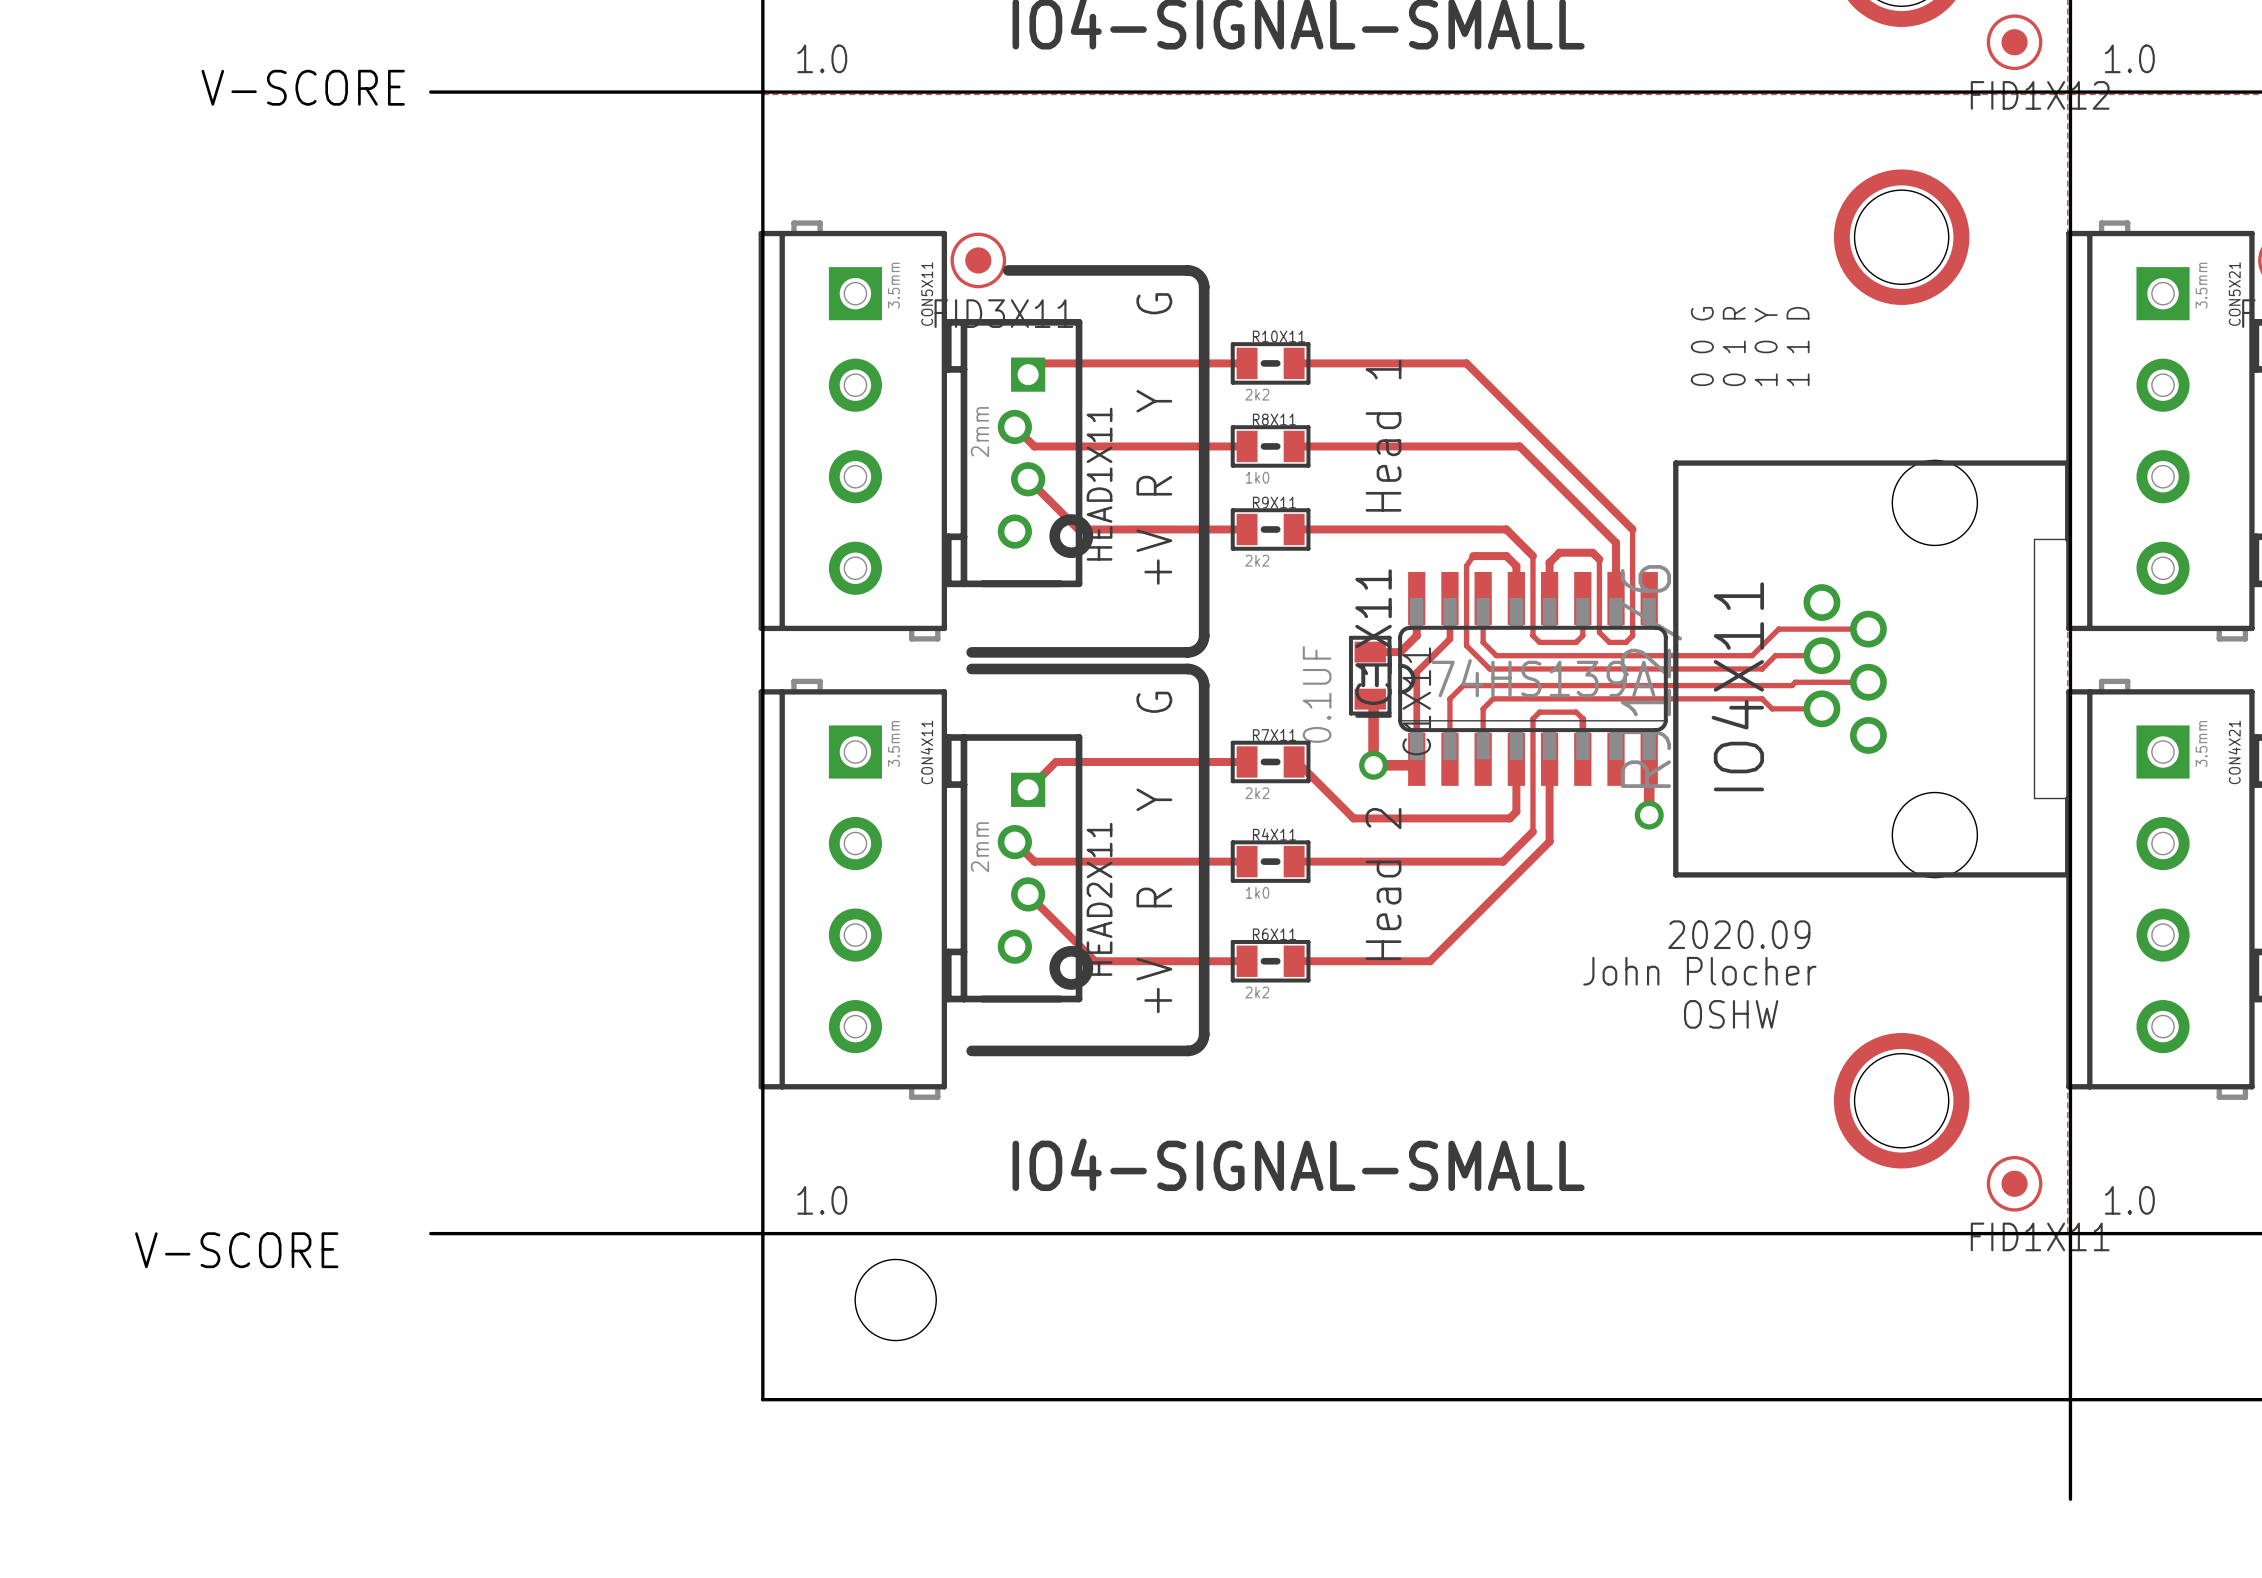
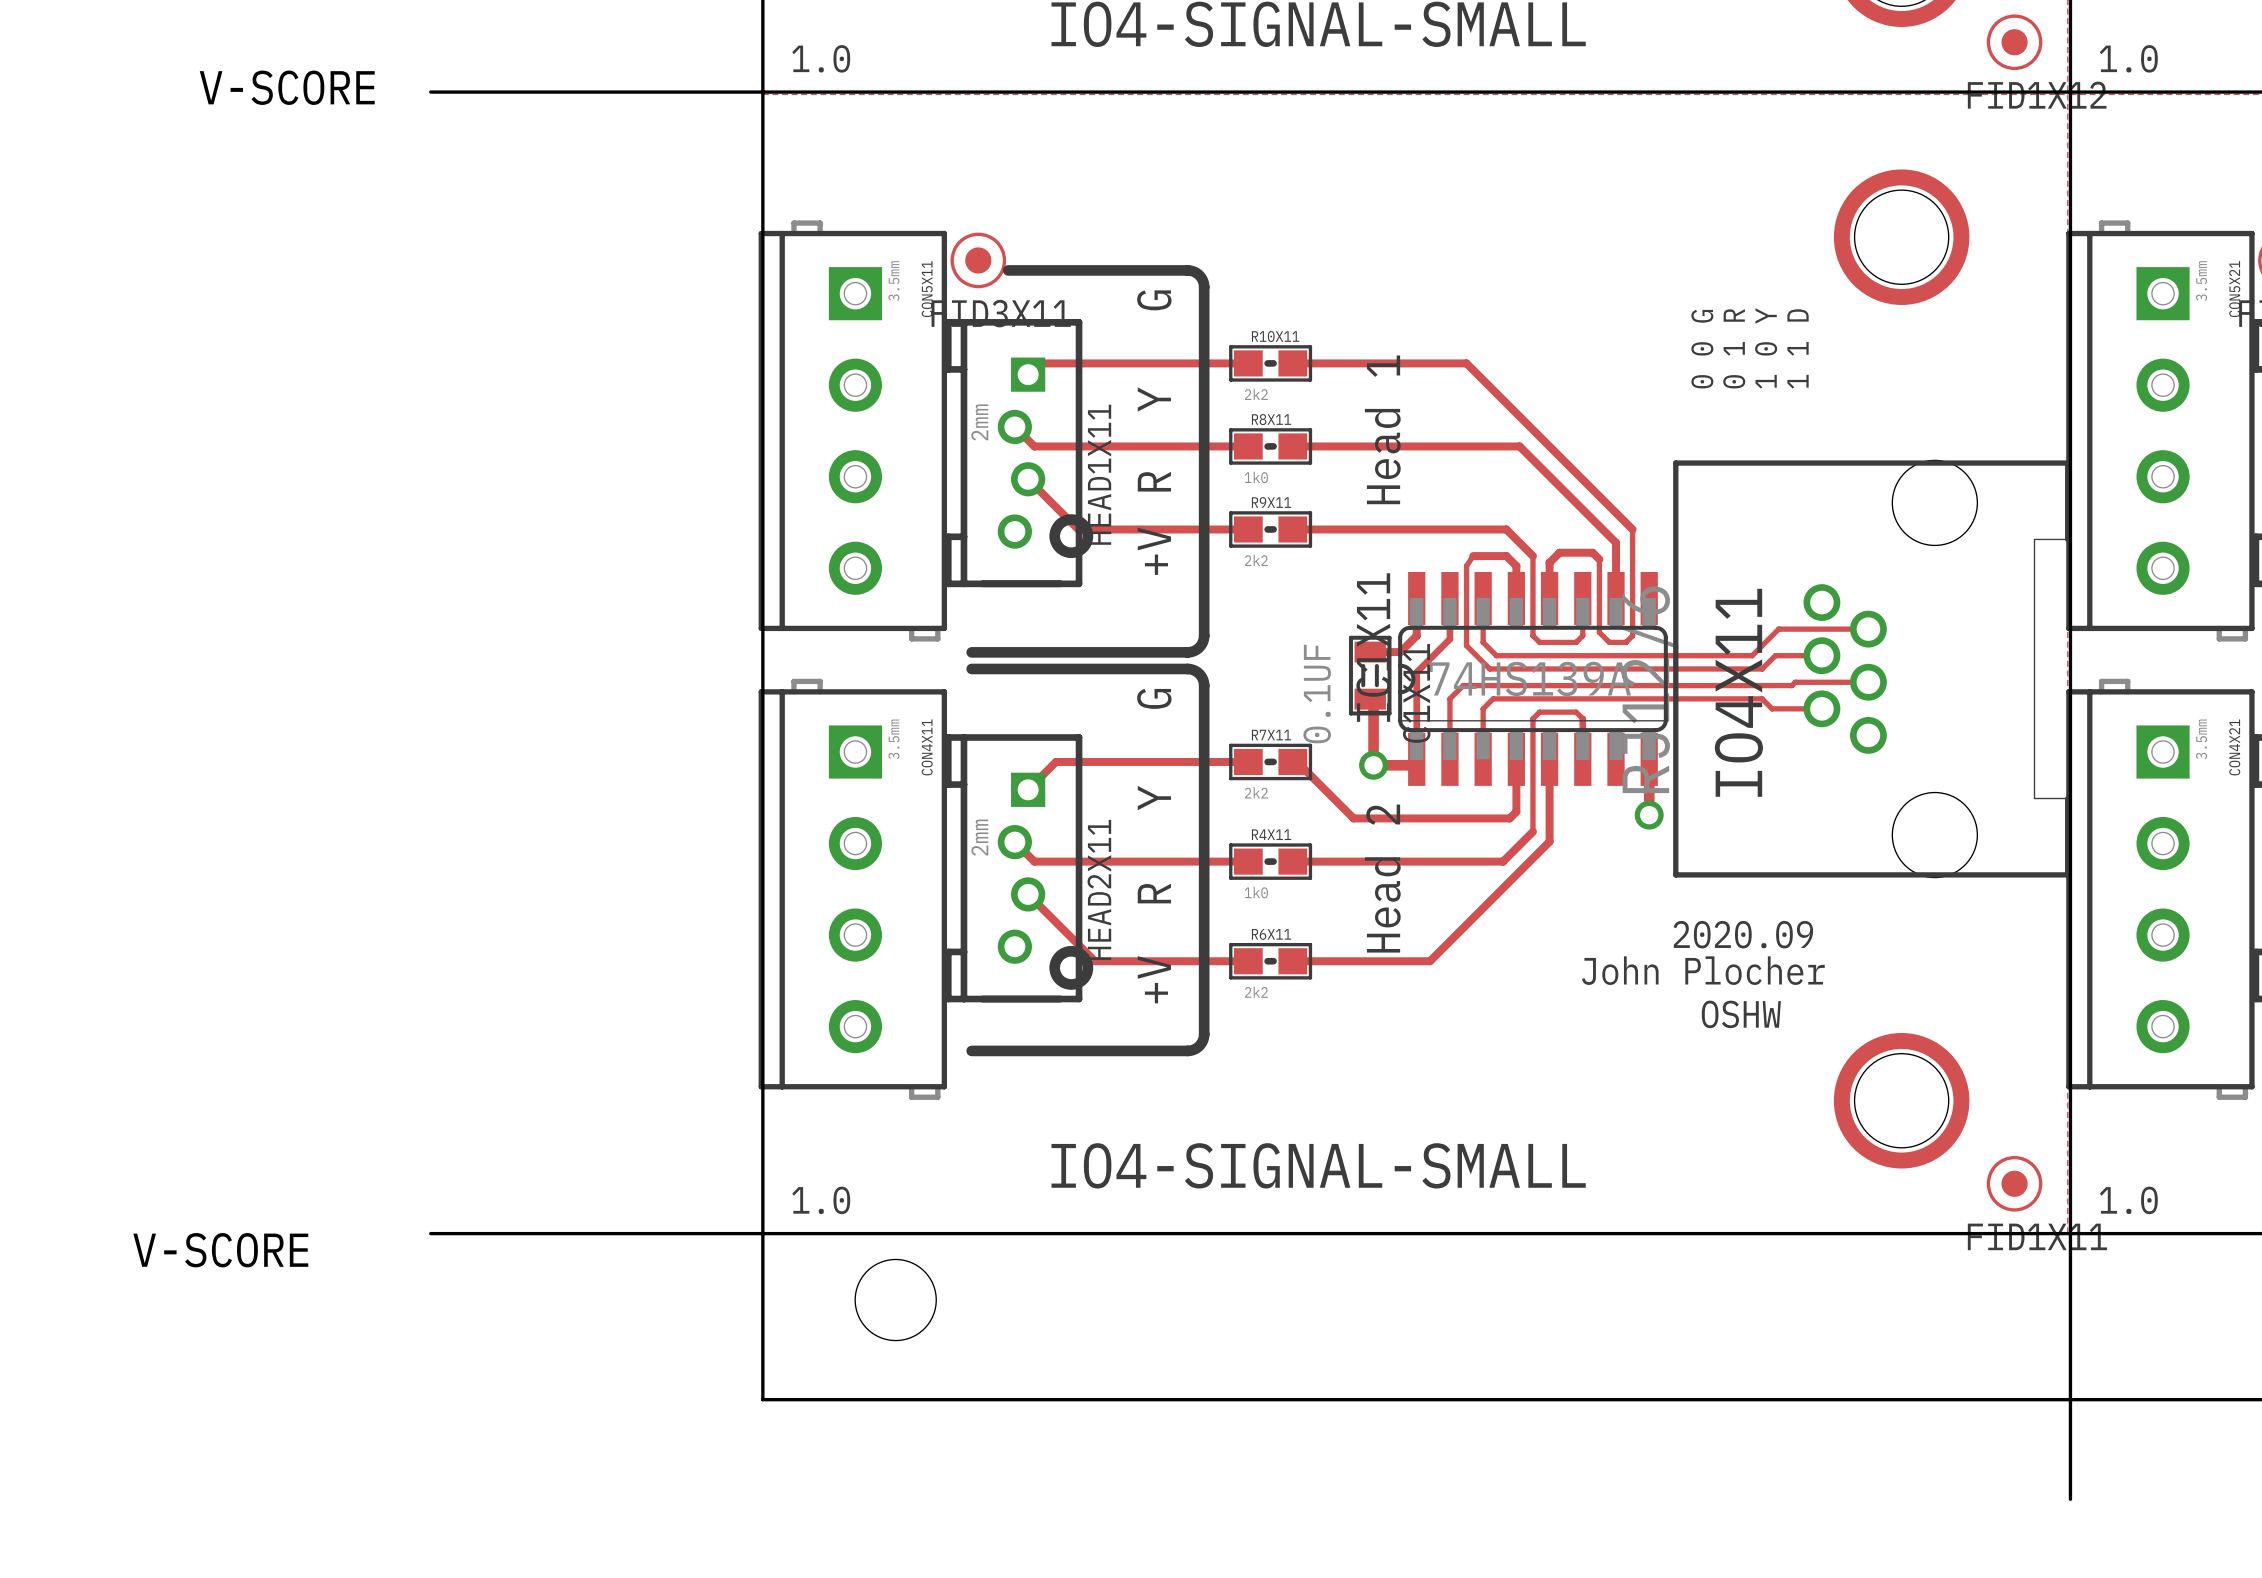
R10X11 footprint: [1230, 342, 1311, 385] -> [1229, 345, 1313, 382]
R8X11 footprint: [1230, 425, 1311, 468] -> [1229, 428, 1313, 465]
R9X11 footprint: [1230, 508, 1311, 551] -> [1229, 511, 1313, 548]
R7X11 footprint: [1230, 740, 1311, 784] -> [1229, 743, 1313, 781]
R4X11 footprint: [1230, 840, 1311, 883] -> [1229, 843, 1313, 880]
R6X11 footprint: [1230, 940, 1311, 983] -> [1229, 942, 1313, 980]

